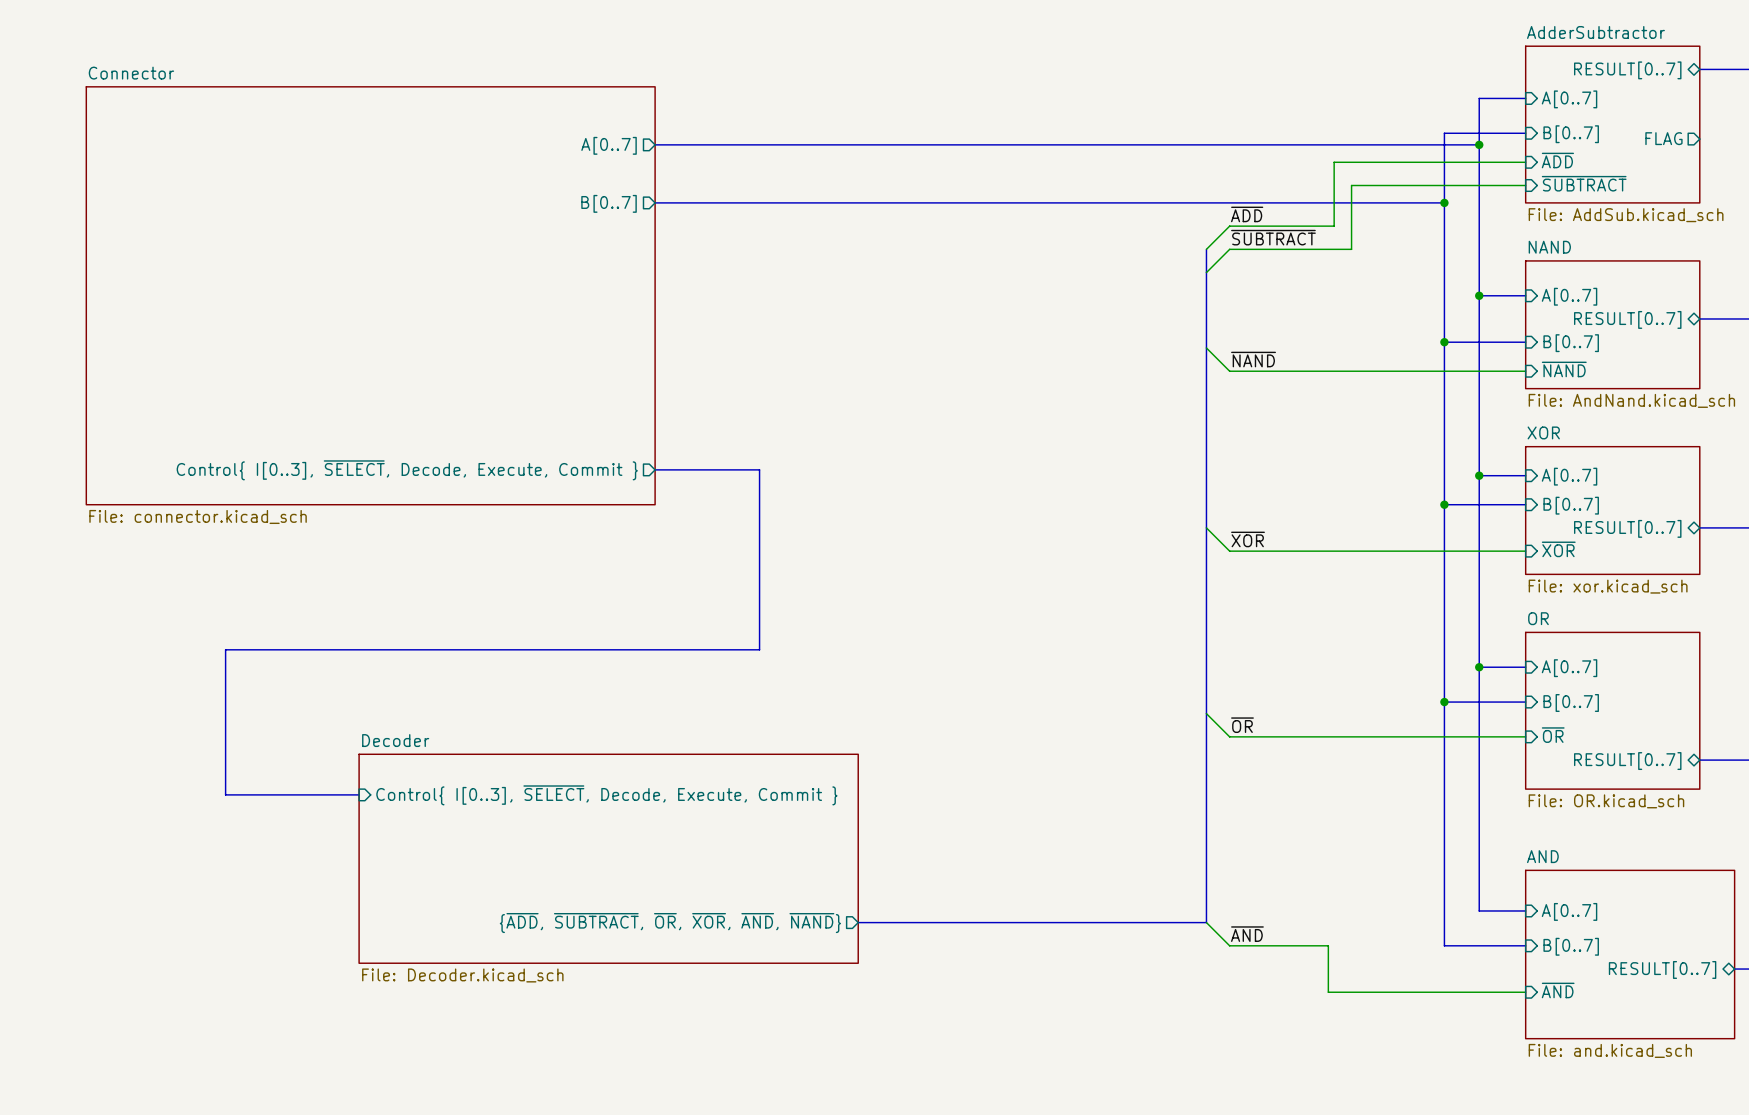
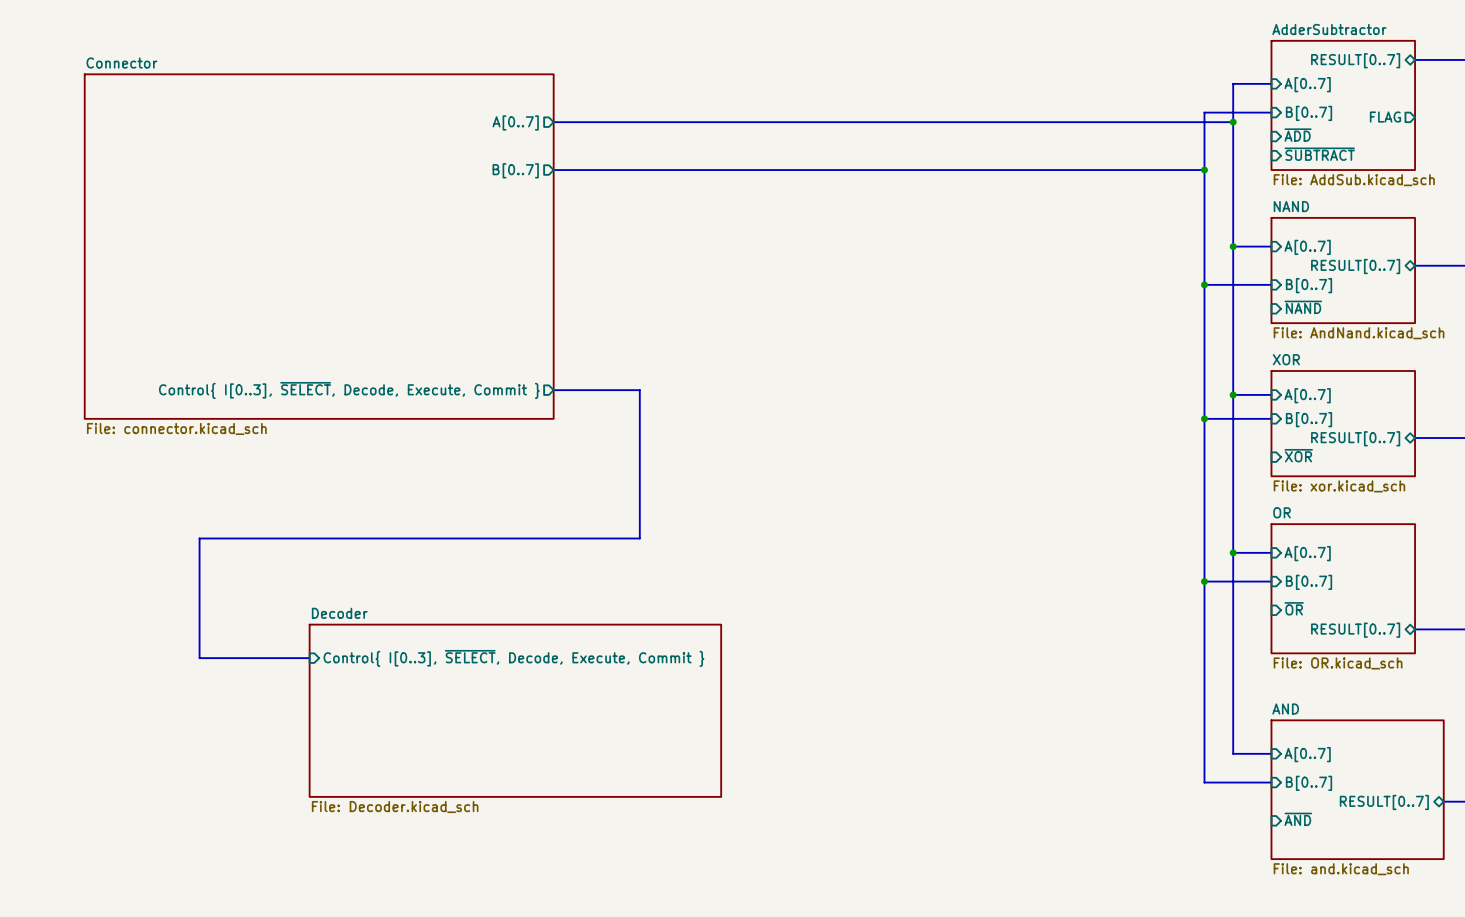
wire: (1525, 162) (1334, 162) (1334, 226) (1229, 226) (1206, 249) -> none
wire: (1525, 185) (1351, 185) (1351, 249) (1229, 249) (1206, 272) -> none
label: ~{ADD} (1247, 214) -> none
label: ~{SUBTRACT} (1273, 237) -> none
bus: (1206, 249) (1206, 922) (858, 922) -> none
wire: (1206, 348) (1229, 371) (1525, 371) -> none
label: ~{NAND} (1253, 359) -> none
wire: (1206, 527) (1229, 551) (1525, 551) -> none
label: ~{XOR} (1248, 539) -> none
wire: (1206, 713) (1229, 736) (1525, 736) -> none
label: ~{OR} (1242, 725) -> none
wire: (1206, 922) (1229, 945) (1328, 945) (1328, 992) (1525, 992) -> none
sheet pin: {~{ADD}, ~{SUBTRACT}, ~{OR}, ~{XOR}, ~{AND}, ~{NAND}} (670, 923) -> none
label: ~{AND} (1247, 934) -> none

